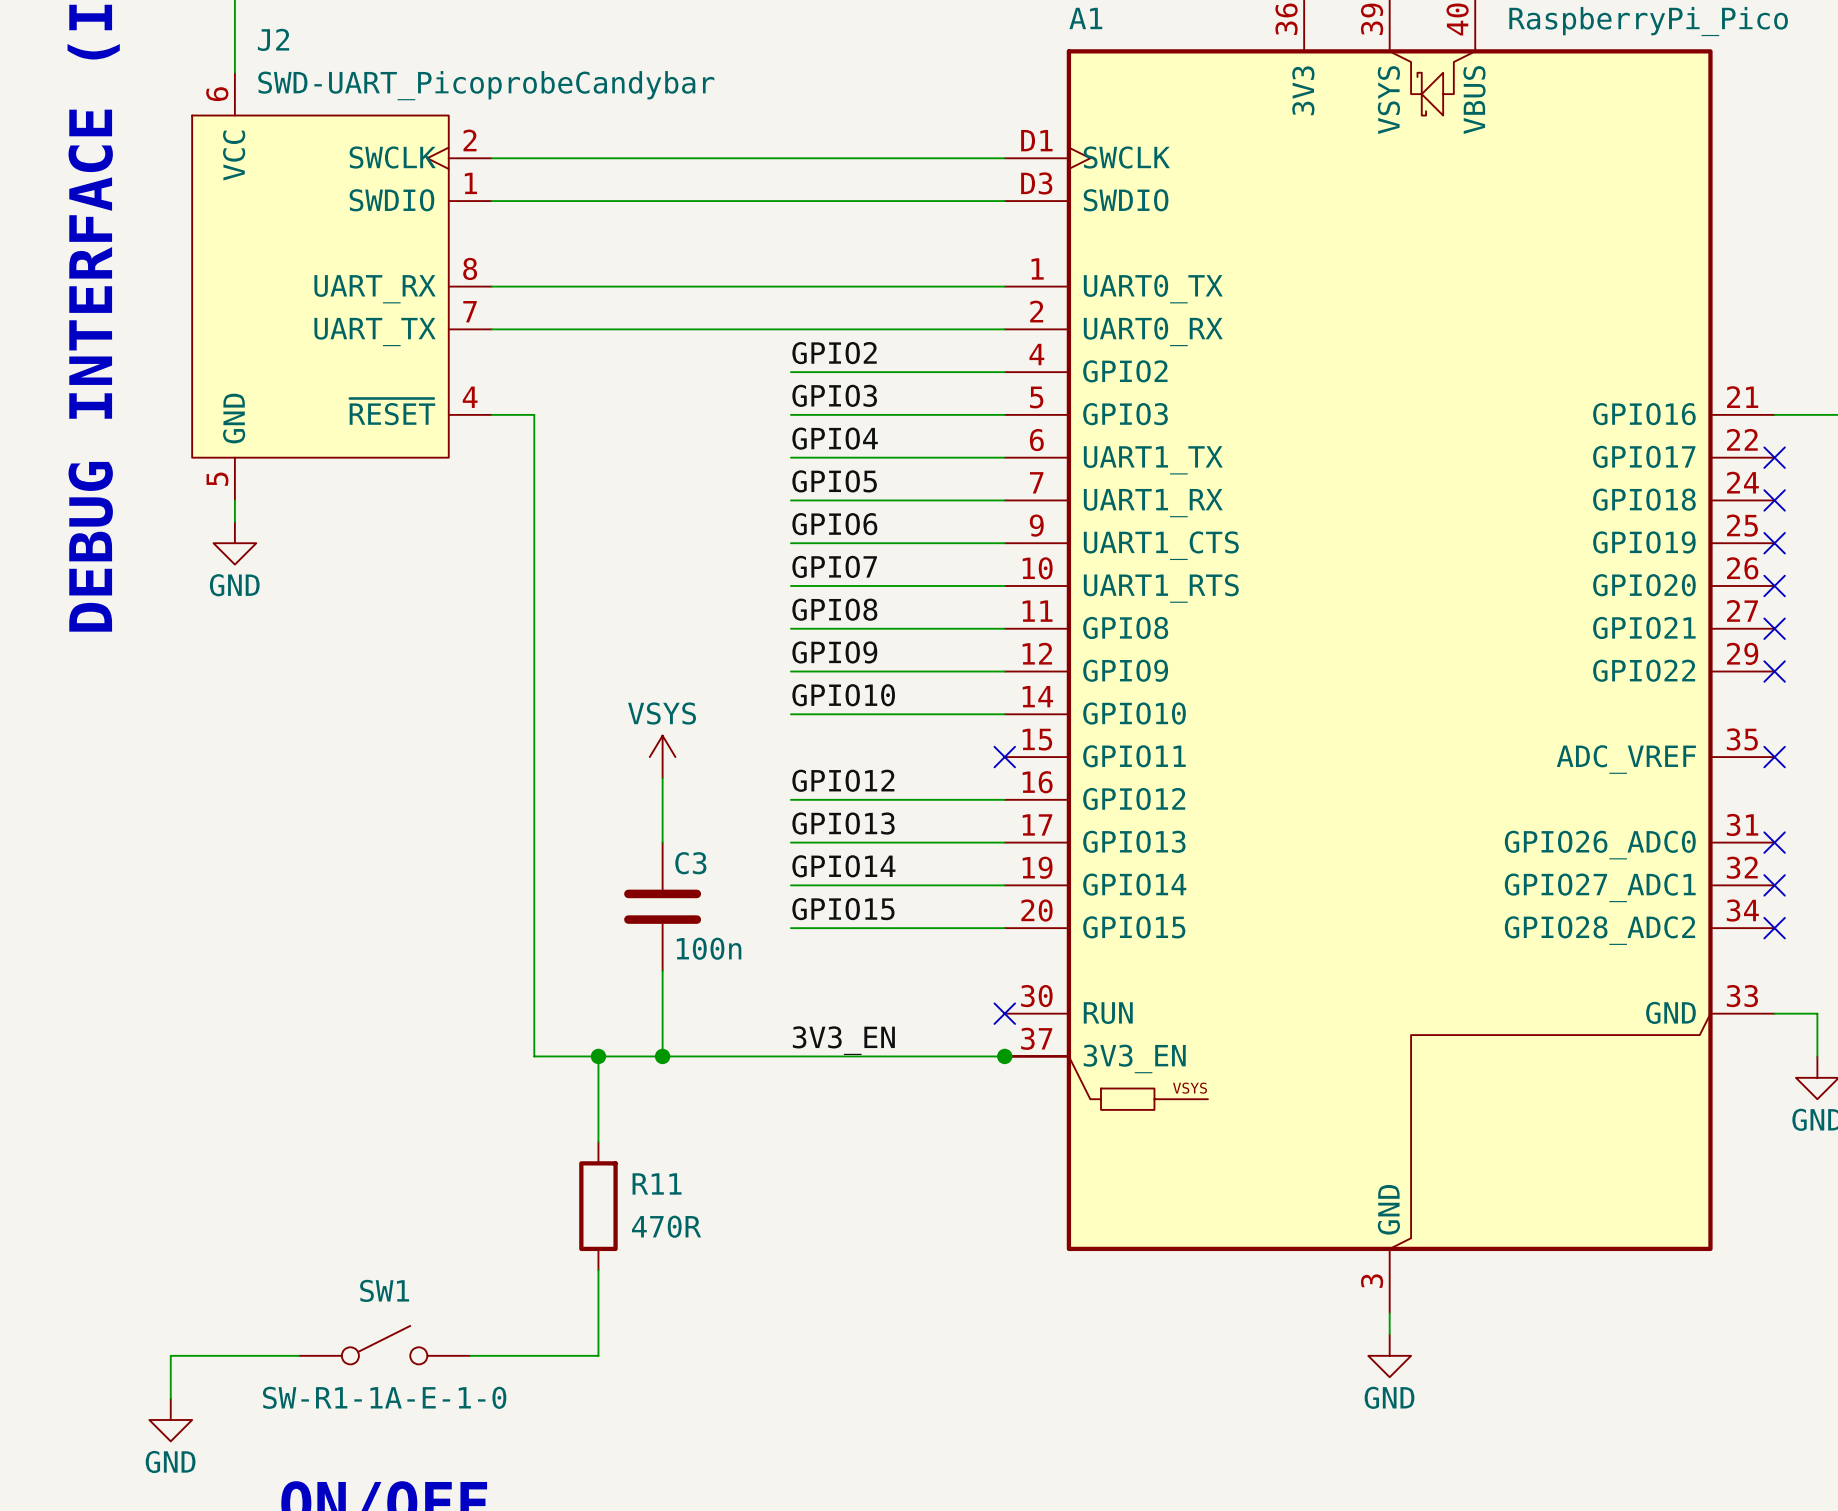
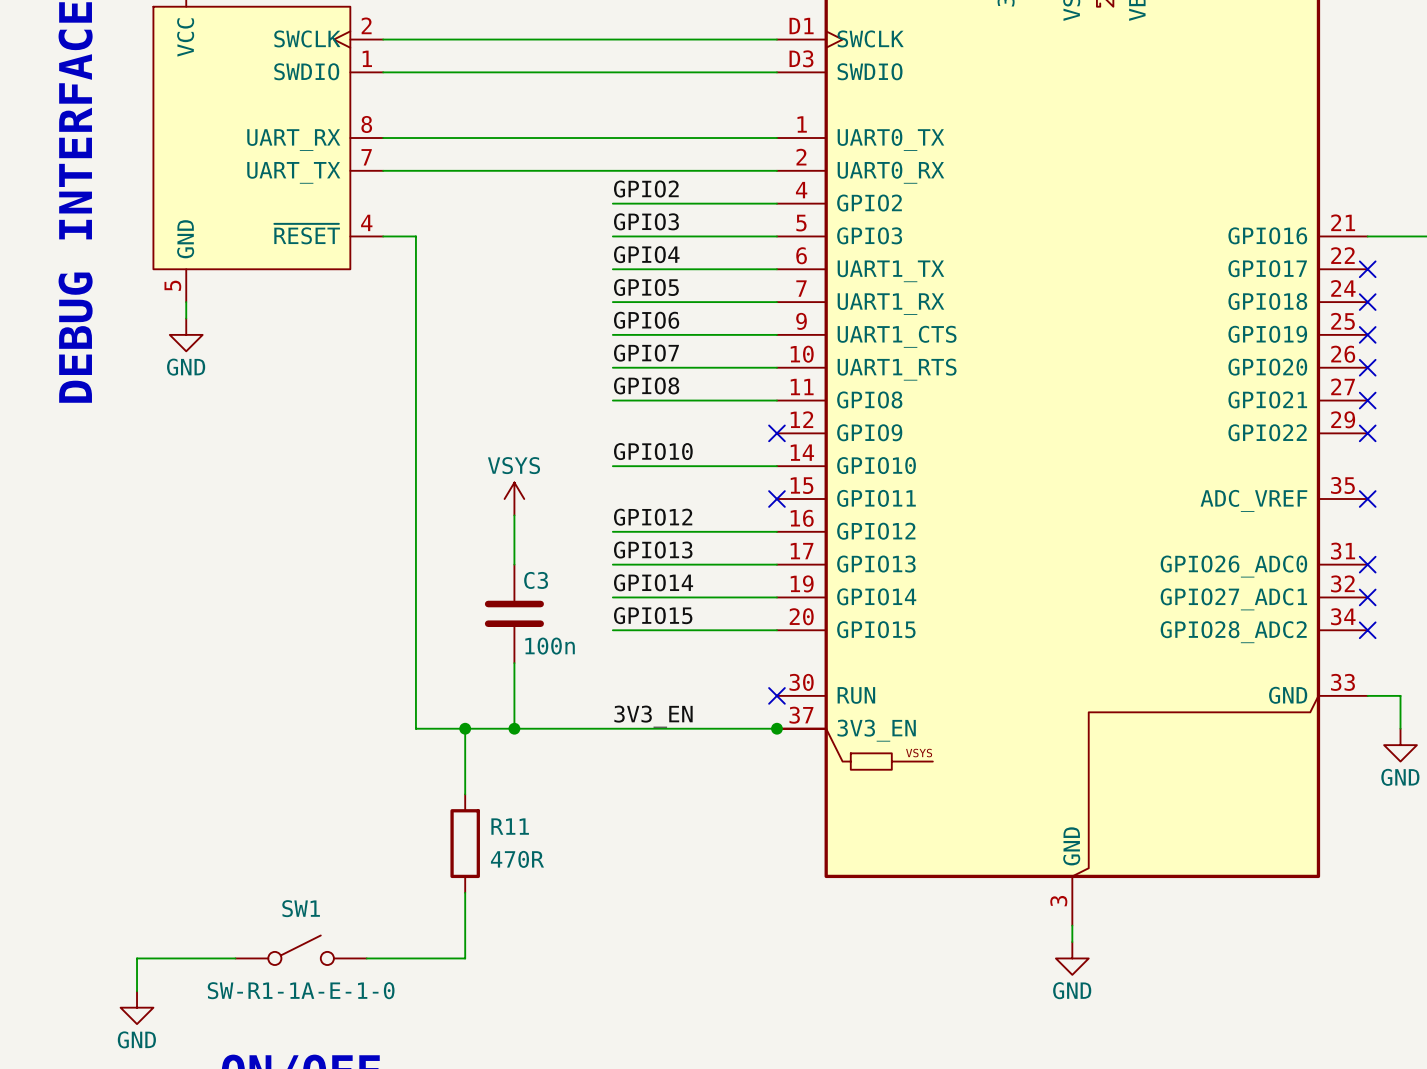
label: GPIO9 (834, 652) -> none
wire: (790, 671) (1004, 671) -> none
no-connect mark: none -> (776, 433)

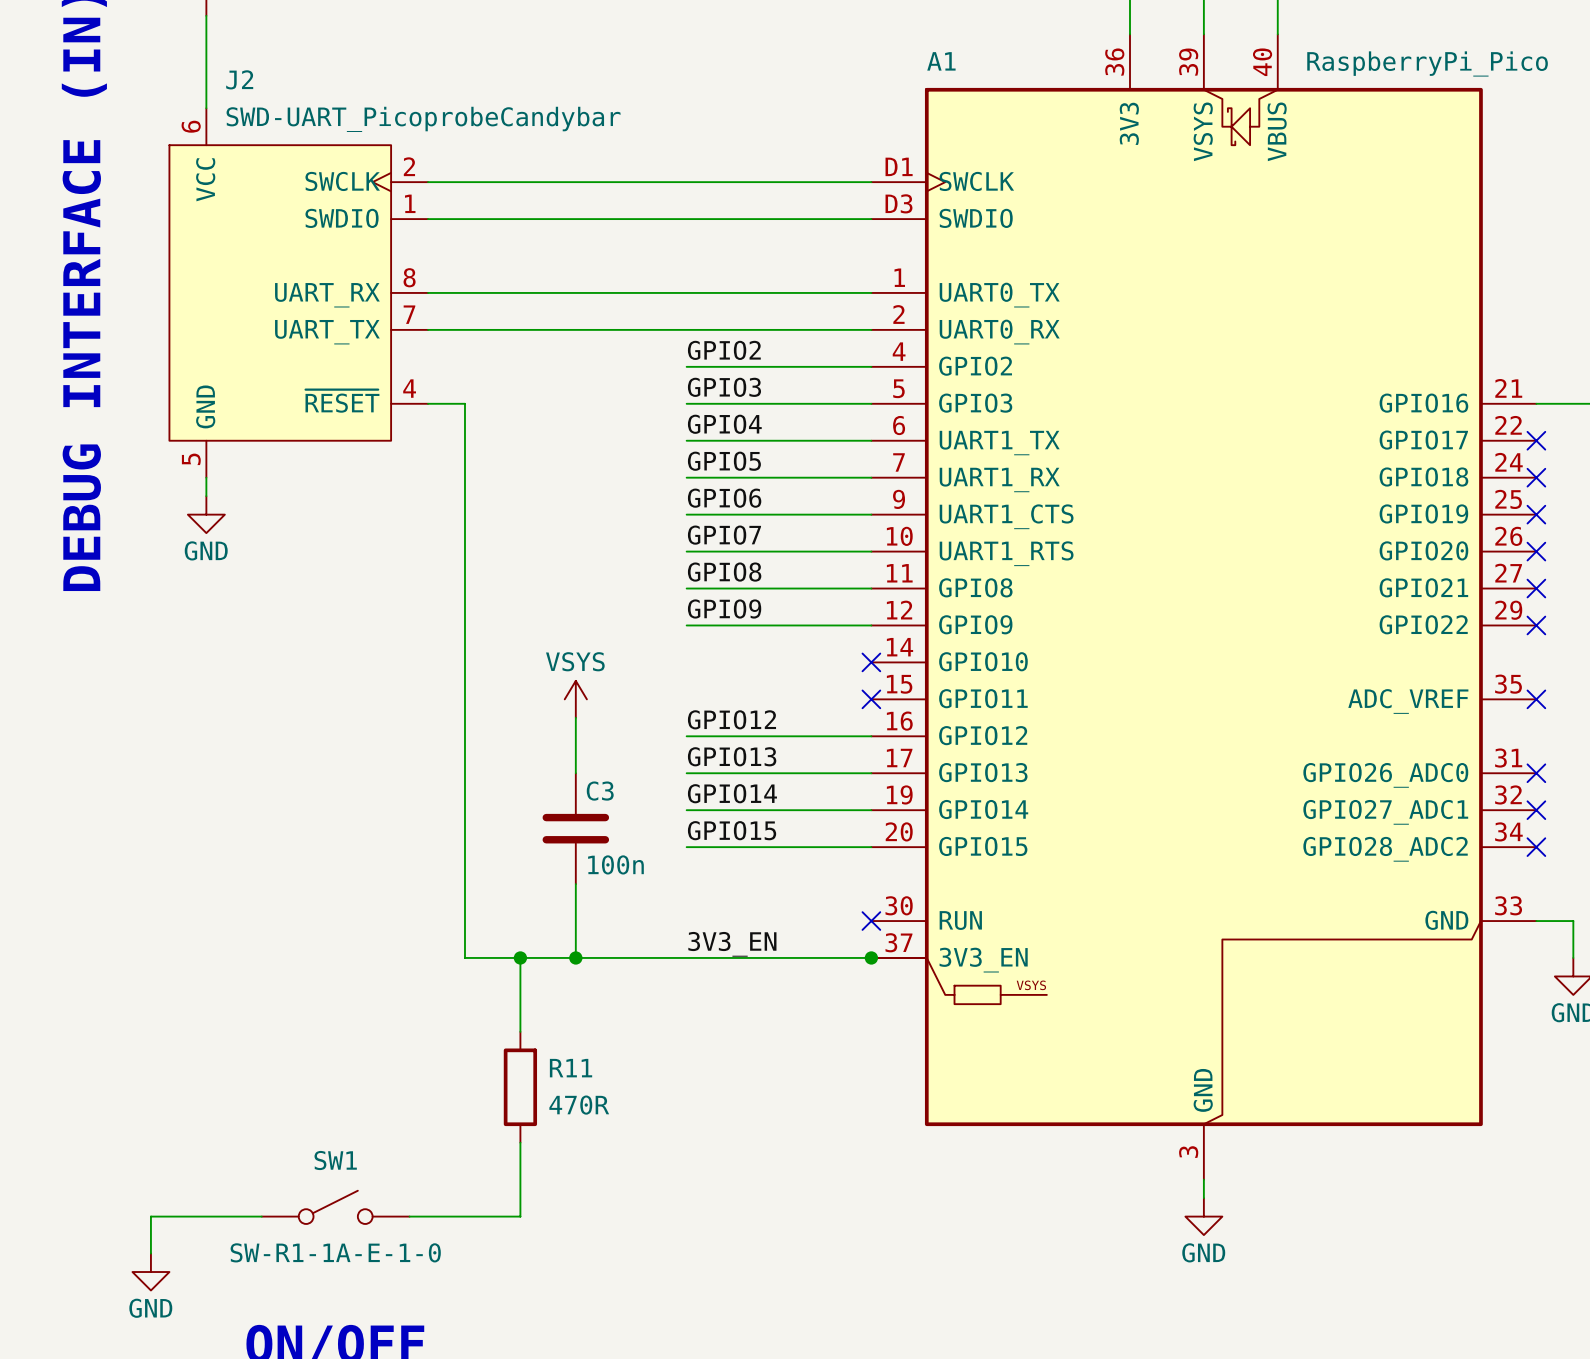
no-connect mark position: (776, 433) -> (871, 662)
label: GPIO10 (653, 451) -> GPIO9 (724, 609)
wire: (612, 466) (776, 466) -> (686, 625) (871, 625)

